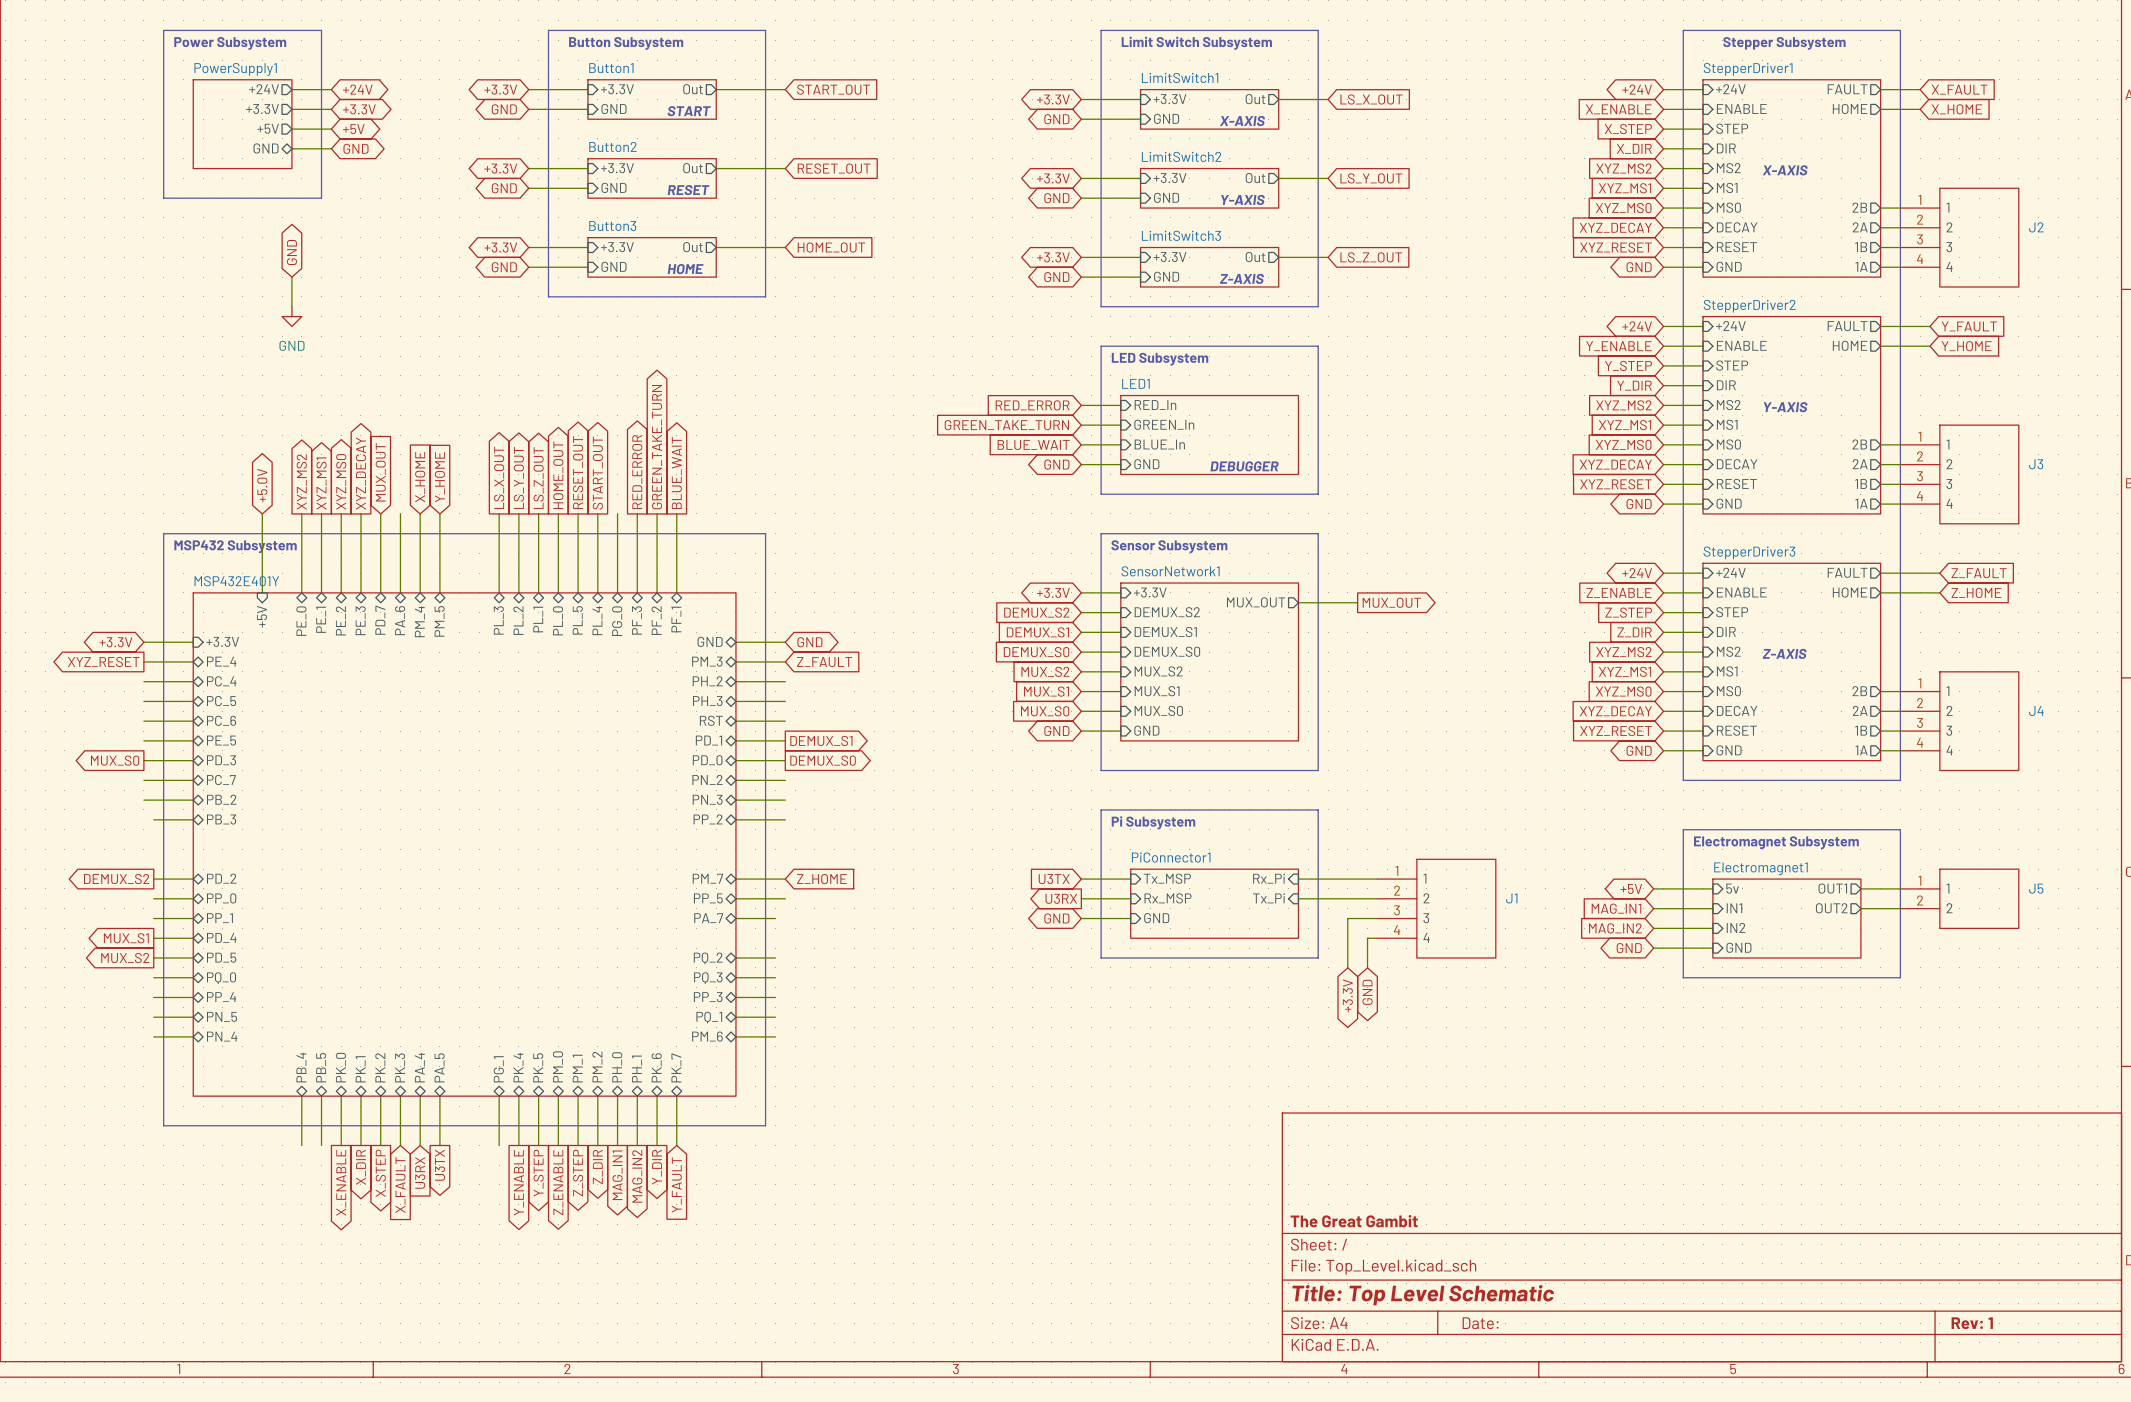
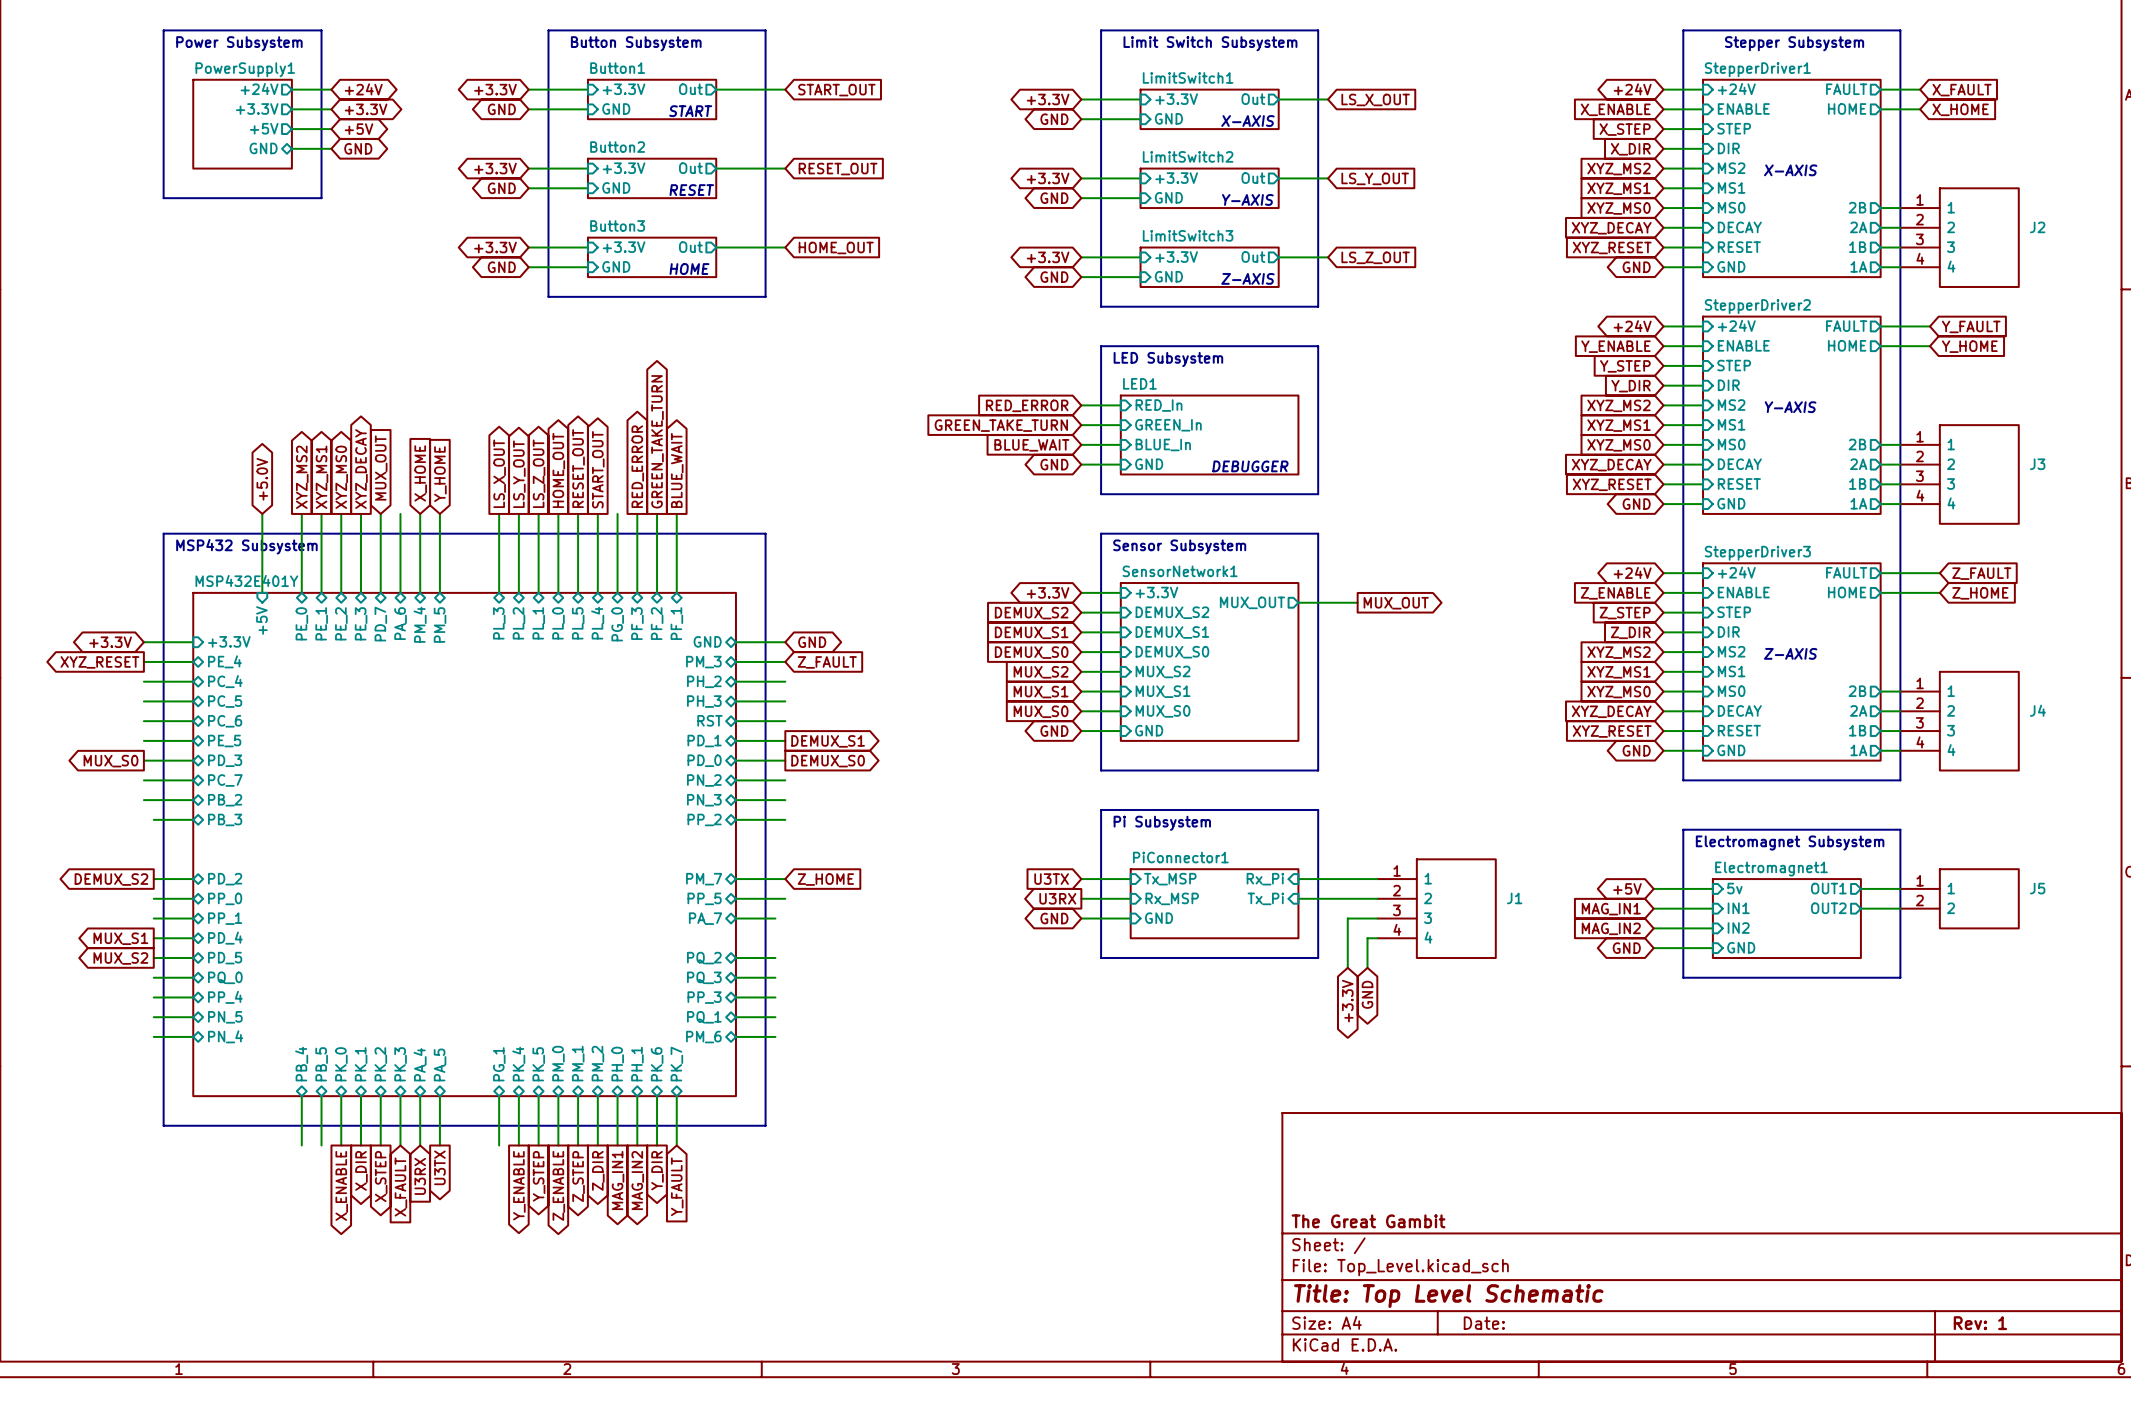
global label: GND (291, 252) -> none
wire: (291, 277) (291, 306) -> none
power symbol: GND (291, 316) -> none

